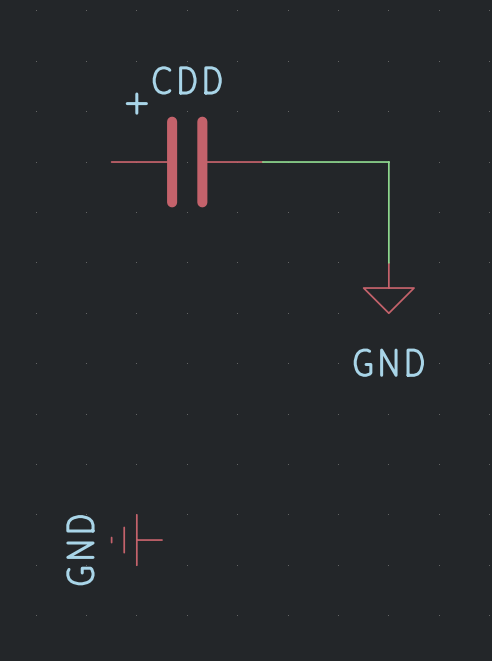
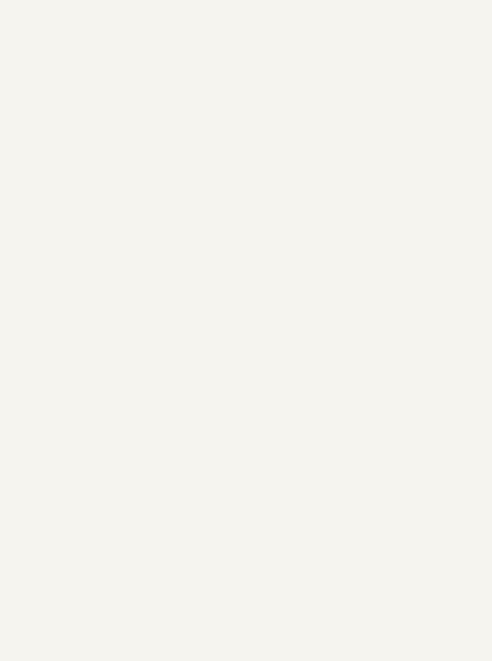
CDD: + (187, 162) -> none
wire: (262, 162) (388, 162) (388, 262) -> none
power symbol: GND (388, 288) -> none
power symbol: GND (136, 540) -> none

